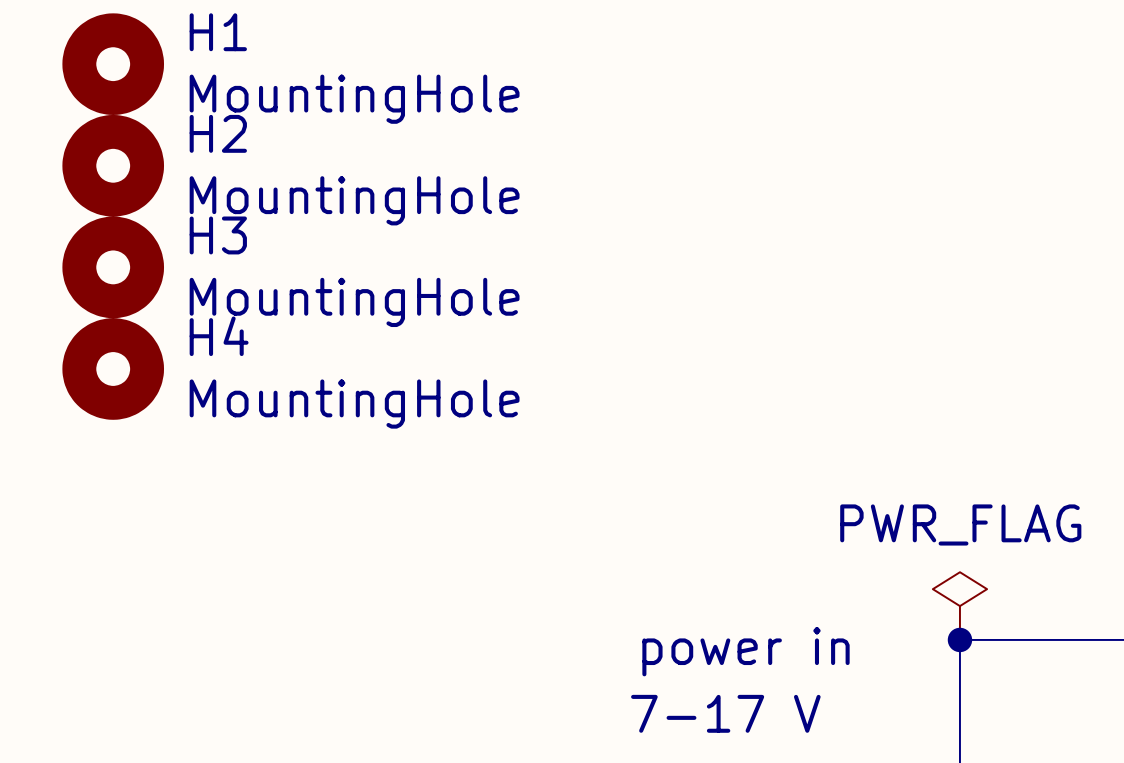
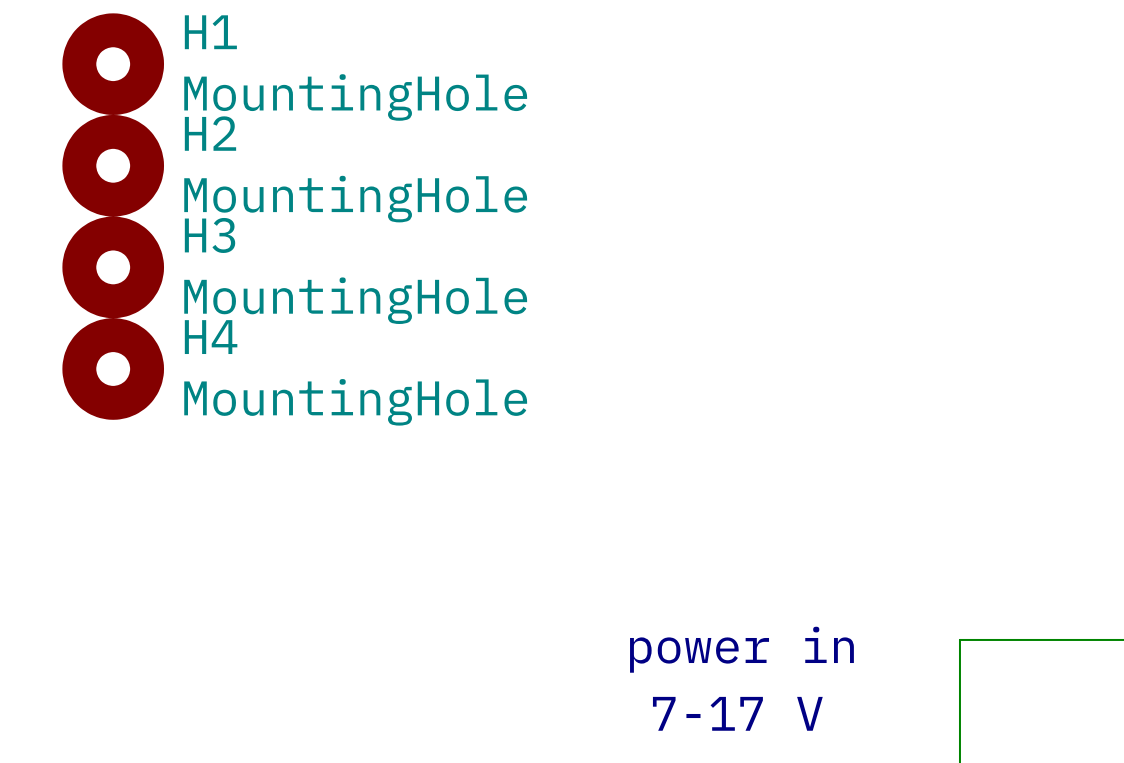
power symbol: PWR_FLAG (959, 606) -> none
junction: (959, 639) -> none

